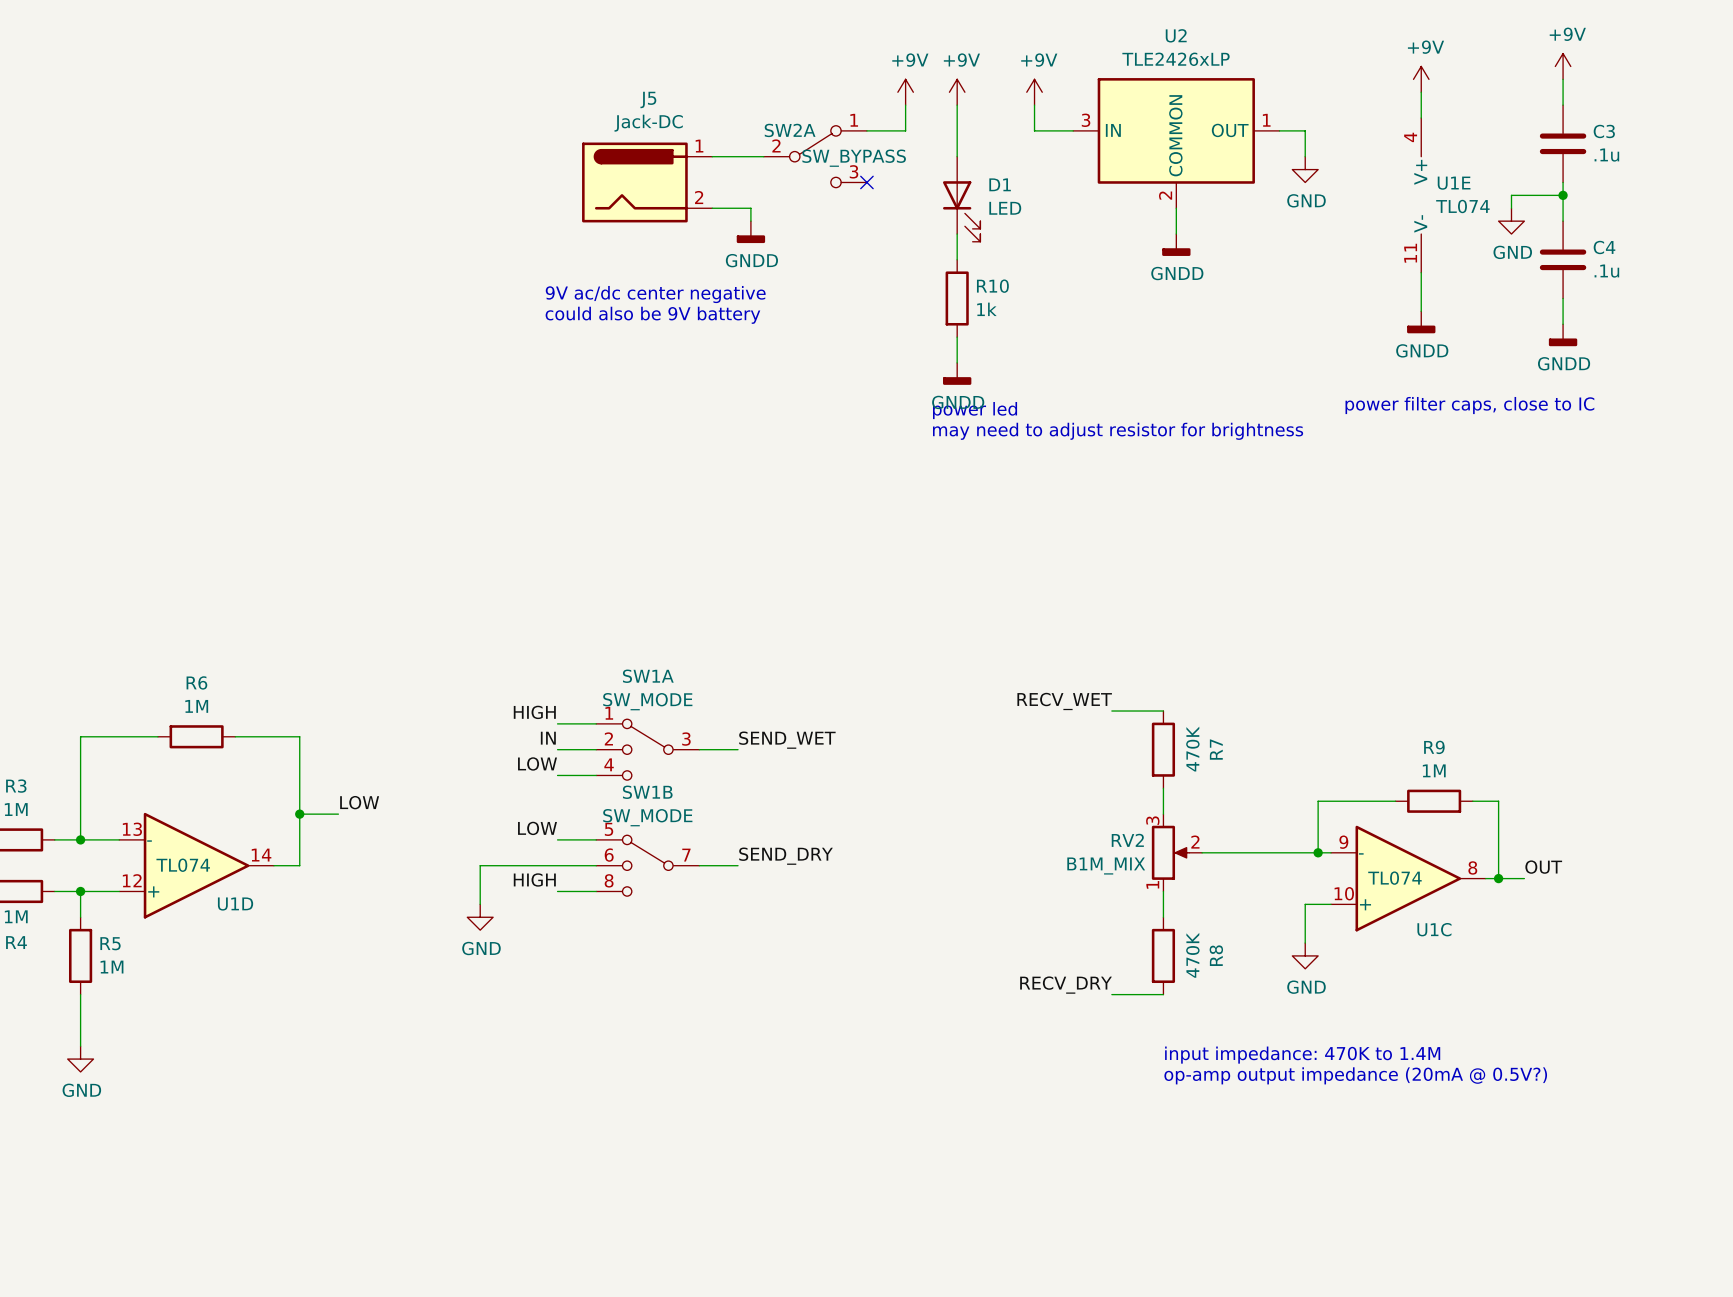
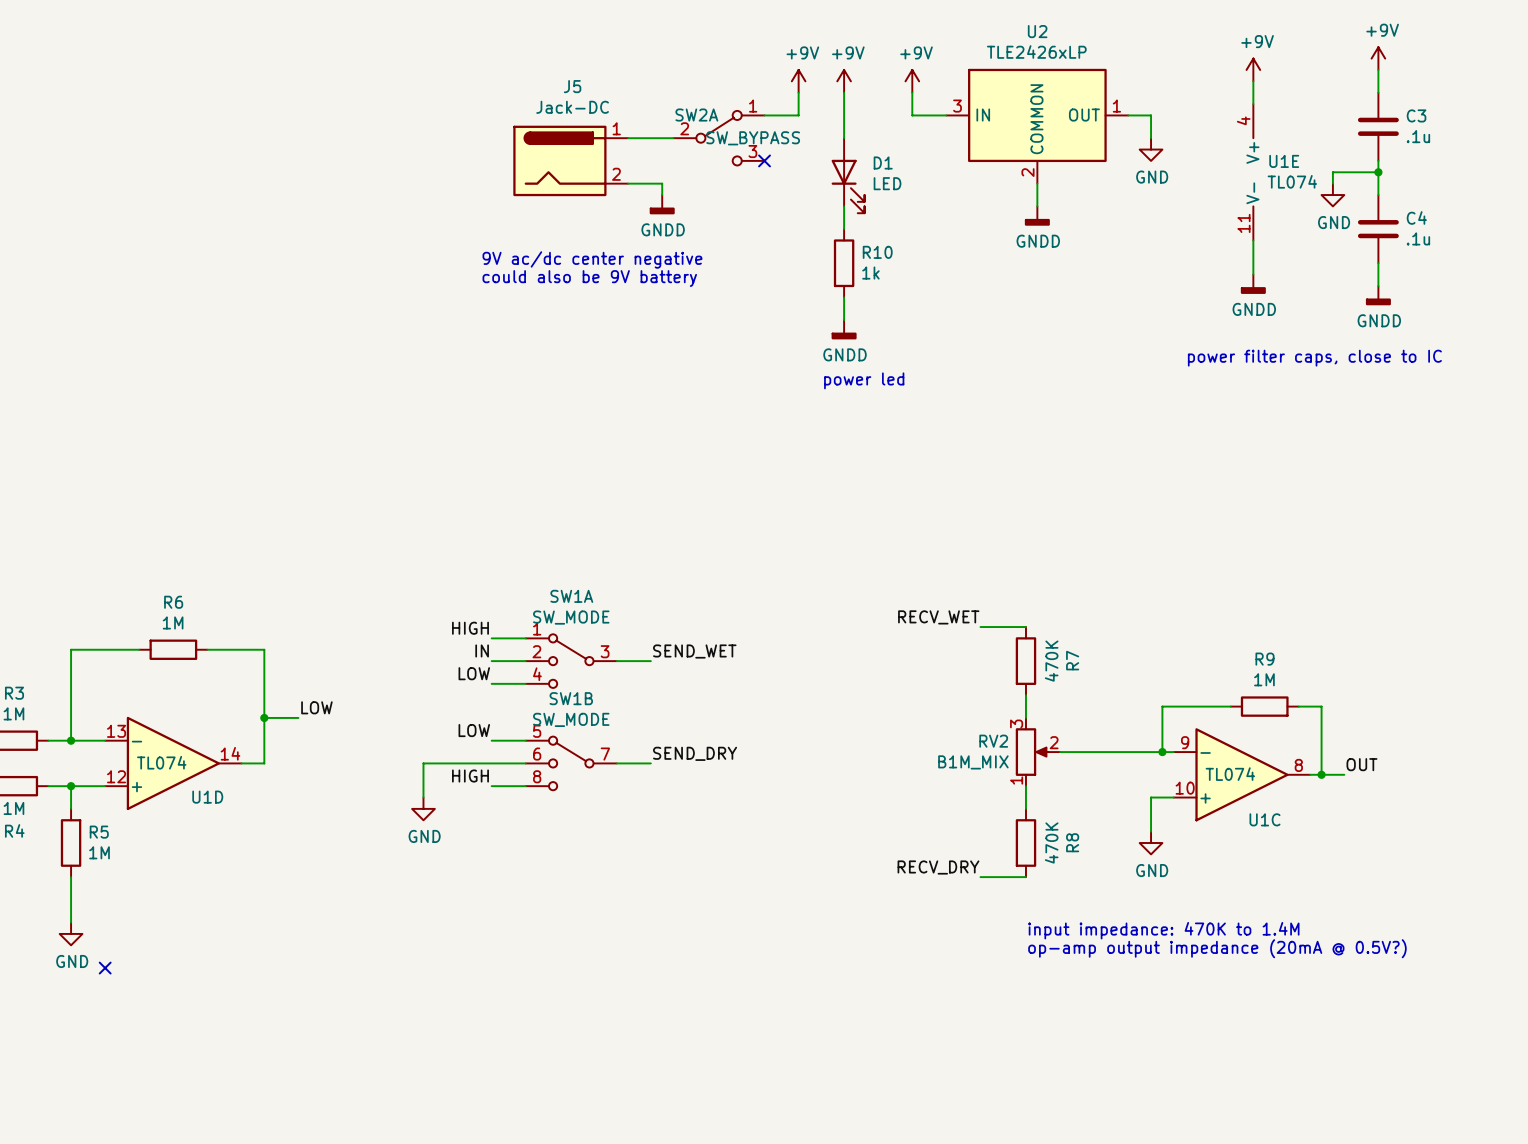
text: power led (975, 410) -> none
text: may need to adjust resistor for brightness (1118, 431) -> power led (864, 380)
no-connect mark: none -> (105, 968)

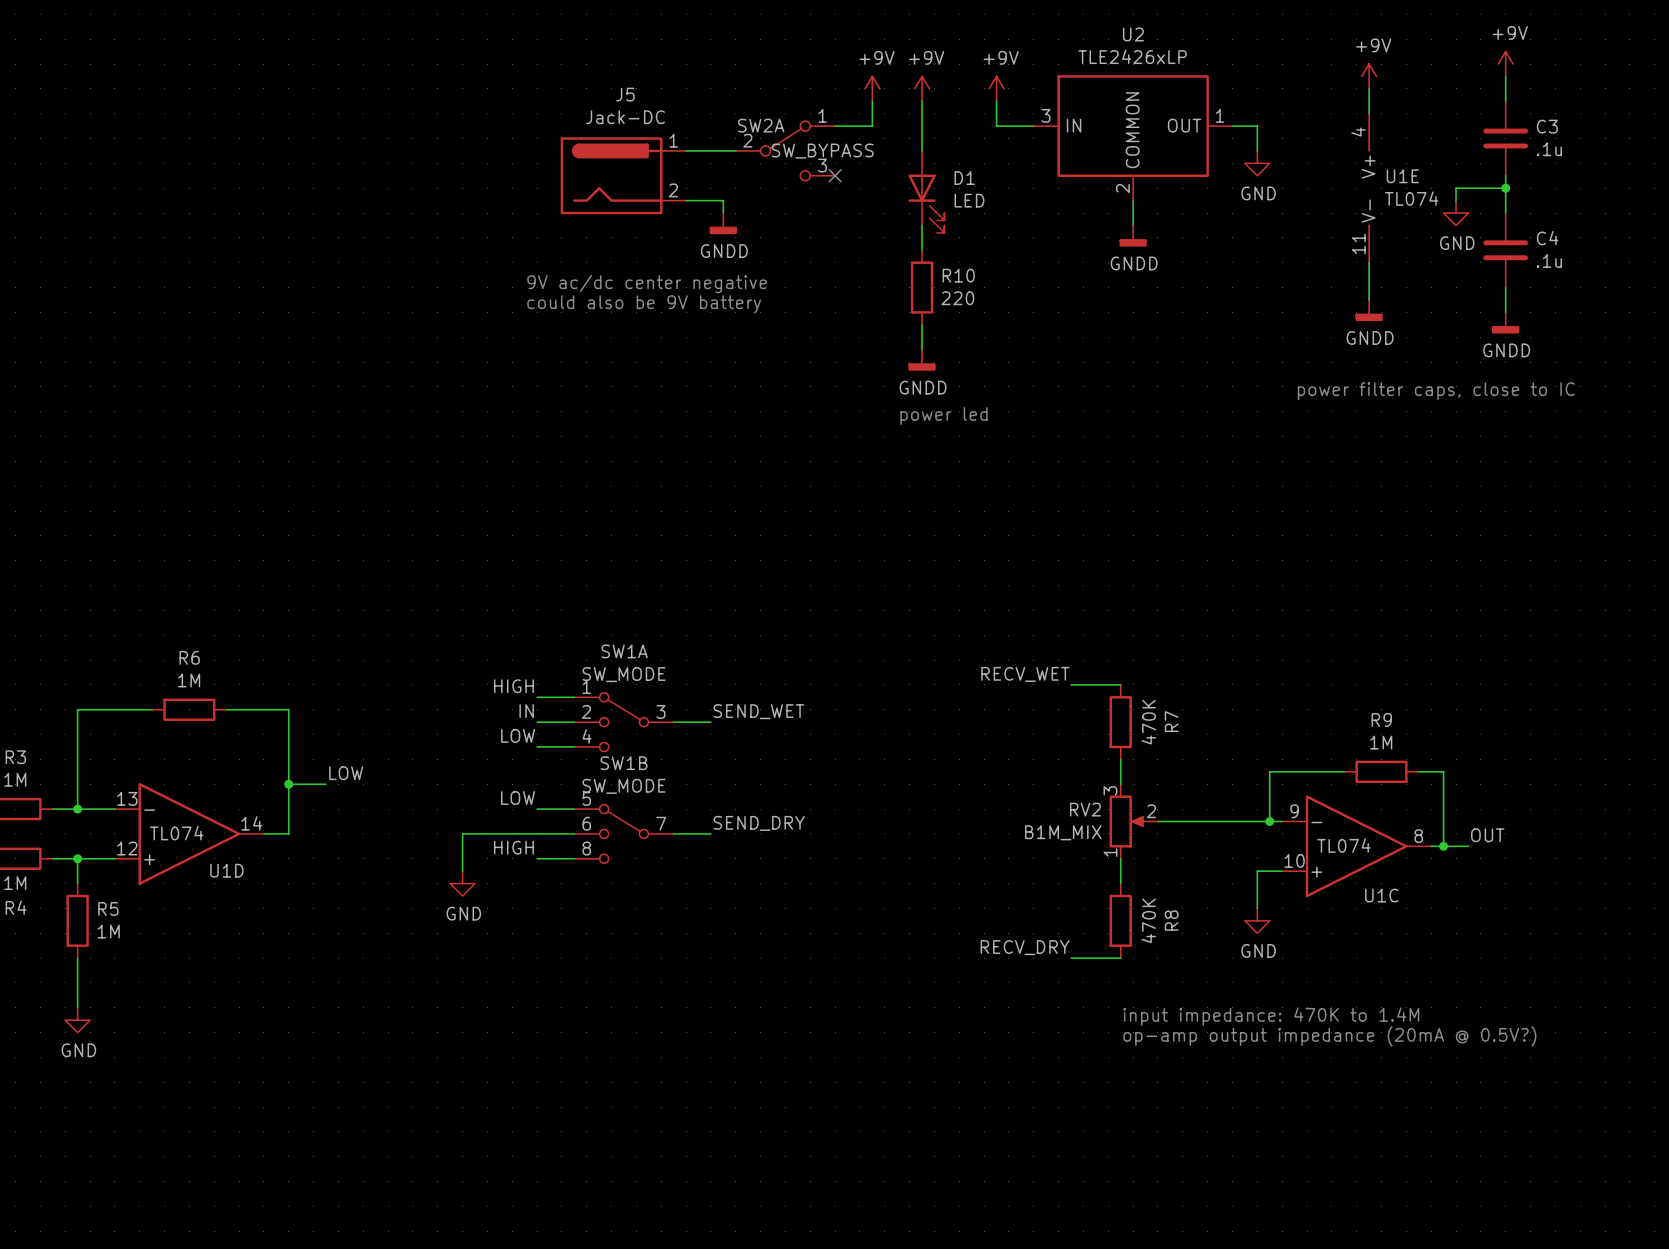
R10 value: 1k (870, 273) -> 220 (957, 298)
no-connect mark: (105, 968) -> none

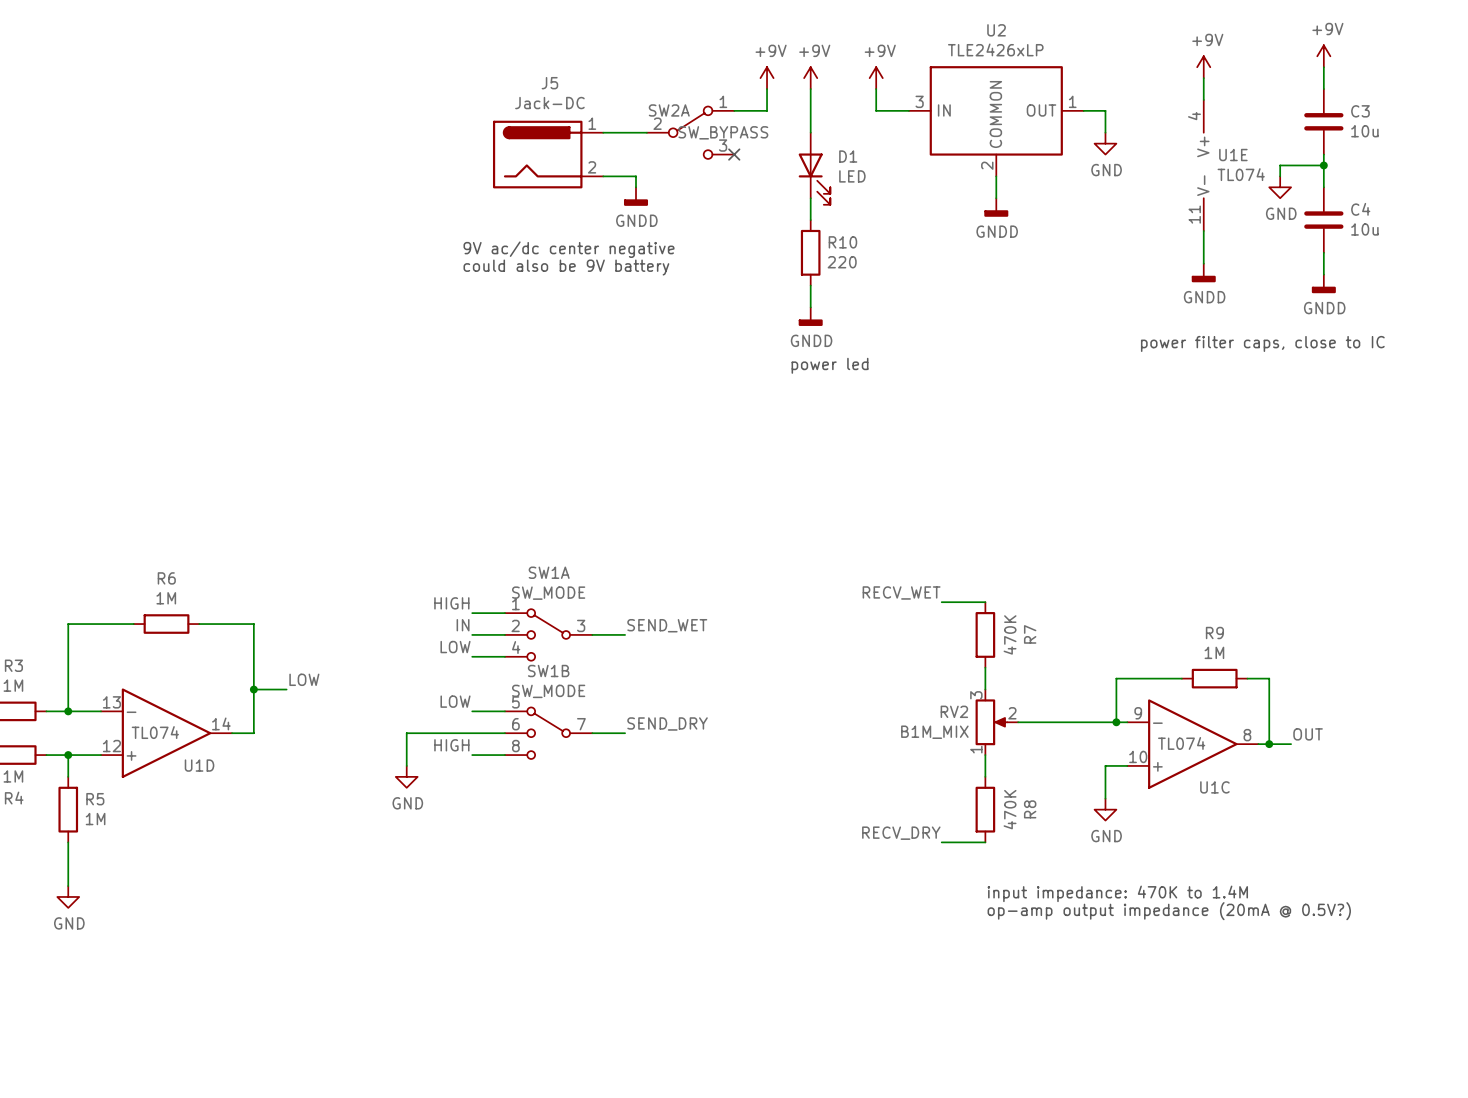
C3 value: .1u (1549, 149) -> 10u (1364, 131)
C4 value: .1u (1549, 261) -> 10u (1364, 229)

